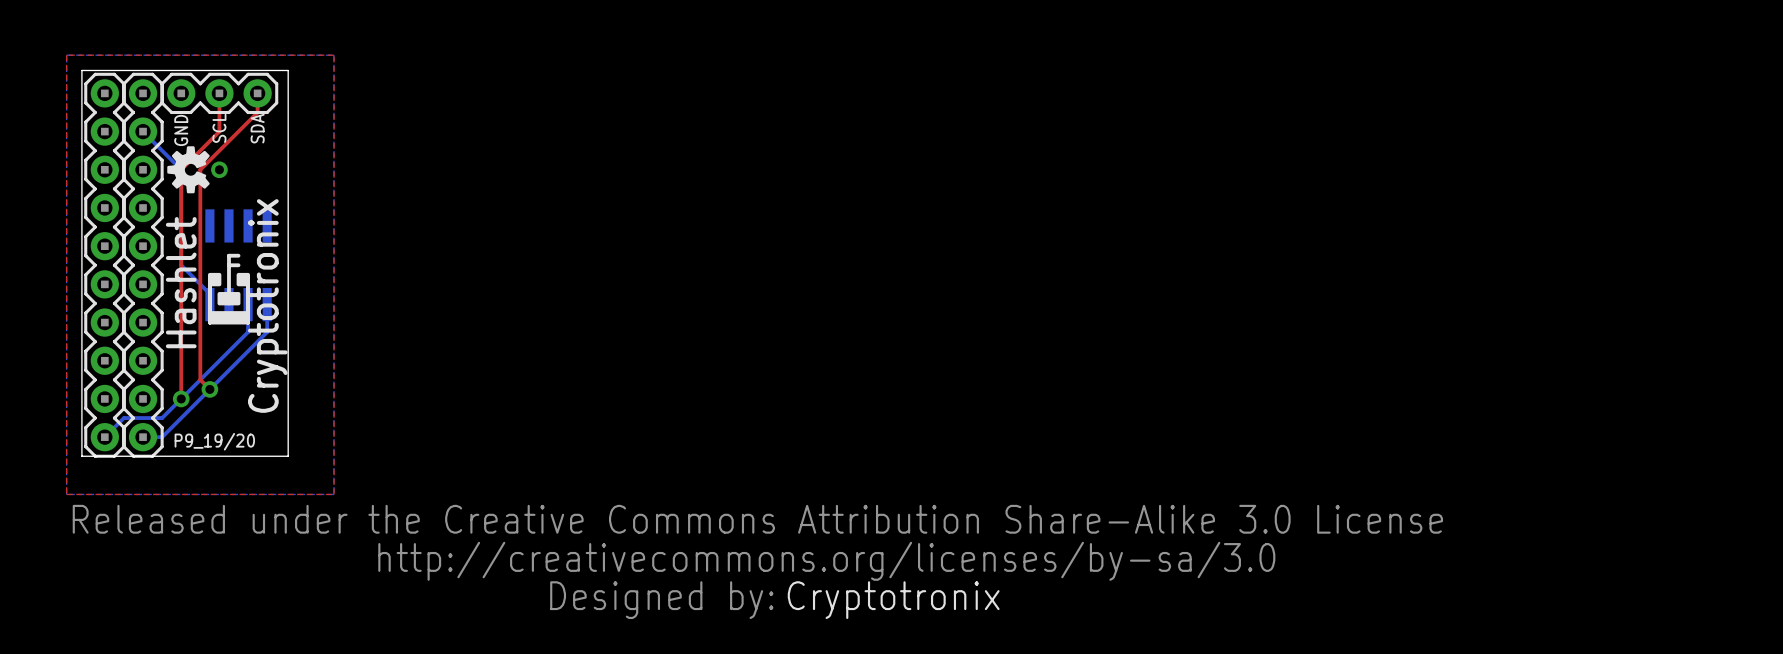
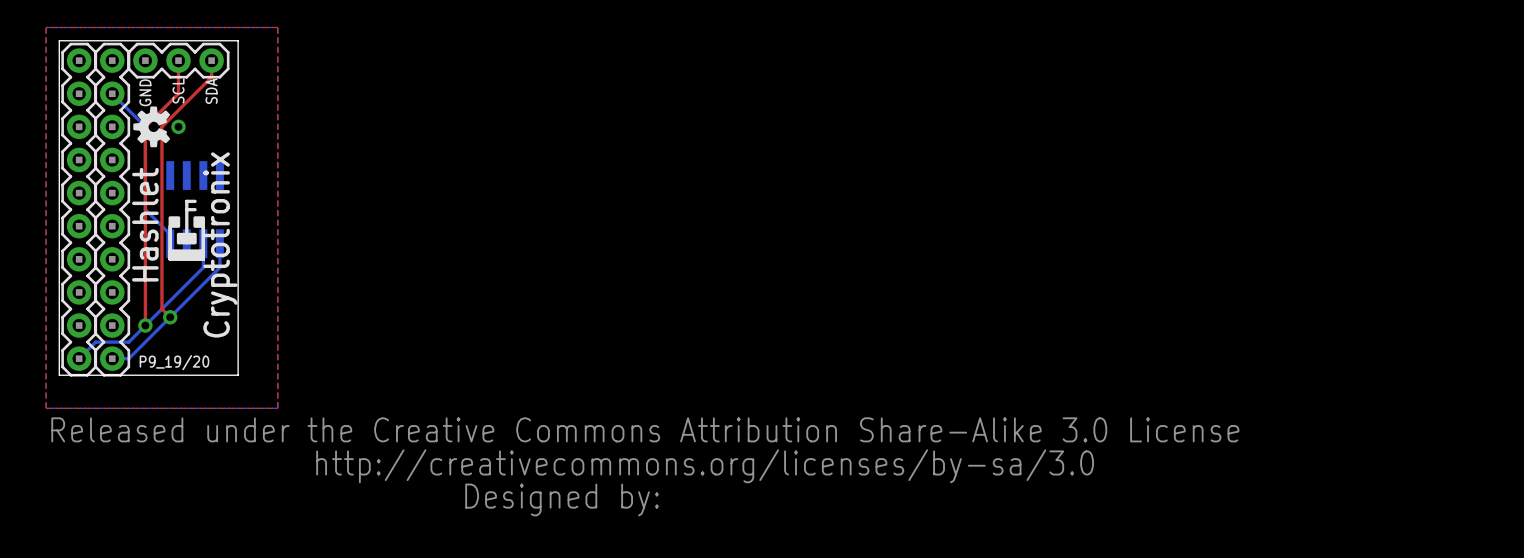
text: Cryptotronix (893, 600) -> none

